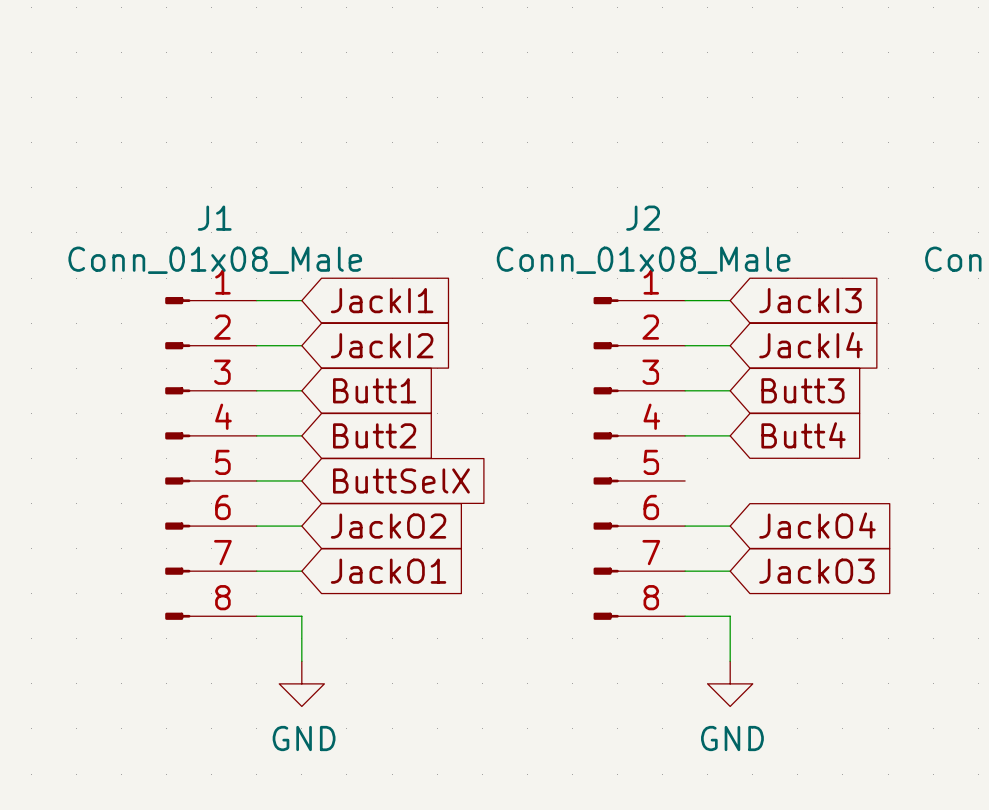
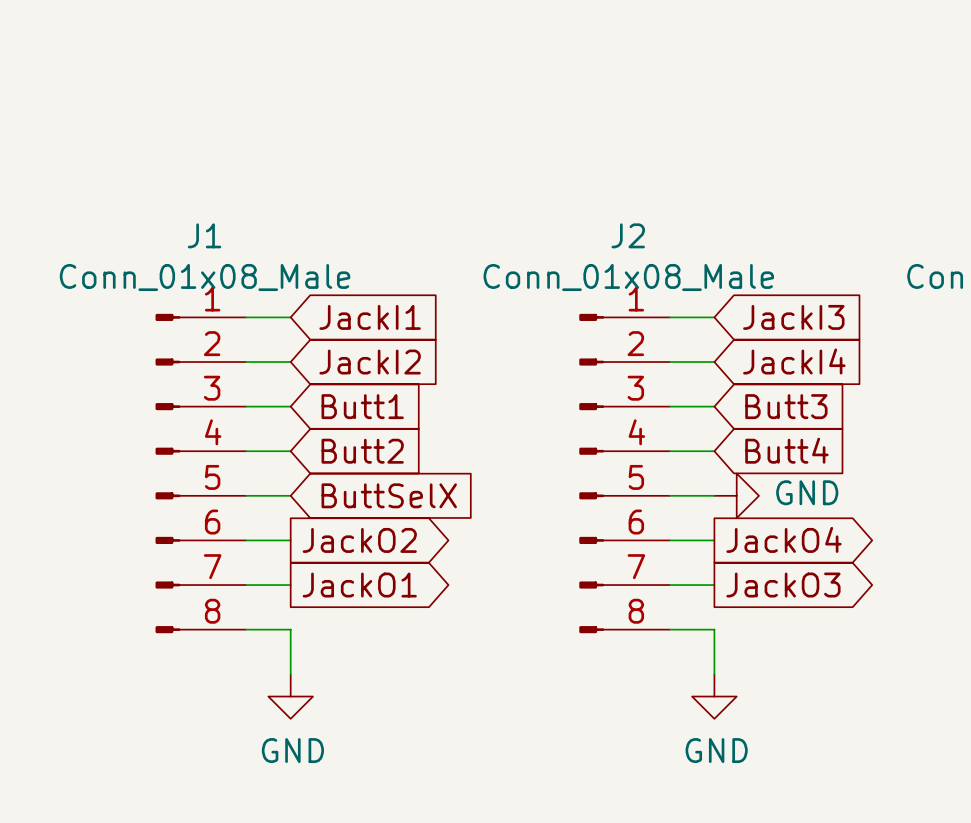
wire: none -> (669, 495) (714, 495)
power symbol: none -> GND (736, 495)
global label shape: input (817, 525) -> output (784, 539)
global label shape: input (388, 526) -> output (359, 540)
global label shape: input (388, 571) -> output (359, 585)
global label shape: input (816, 571) -> output (783, 585)

